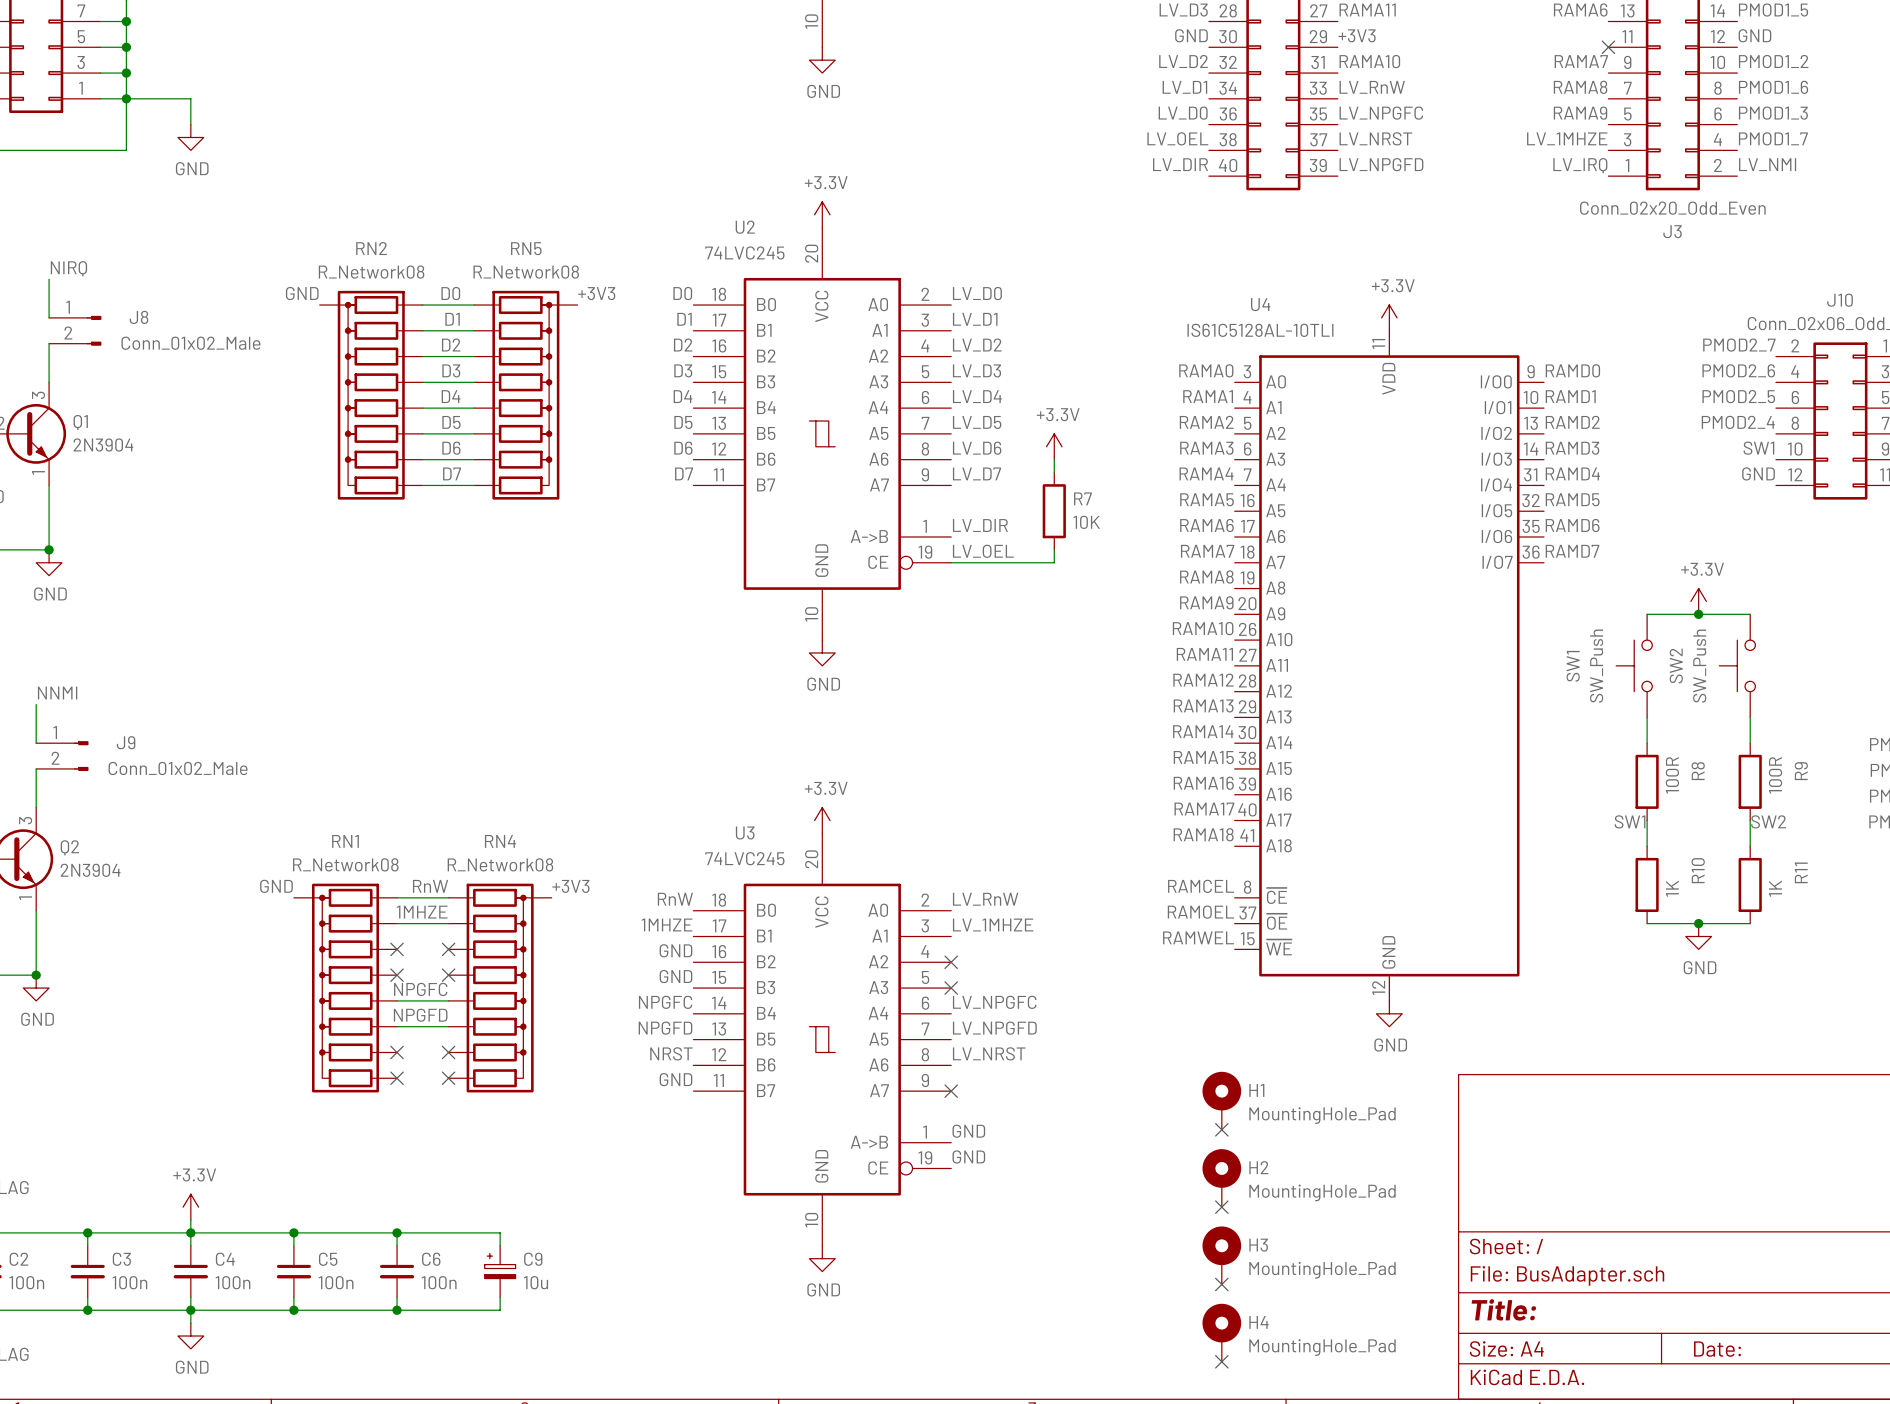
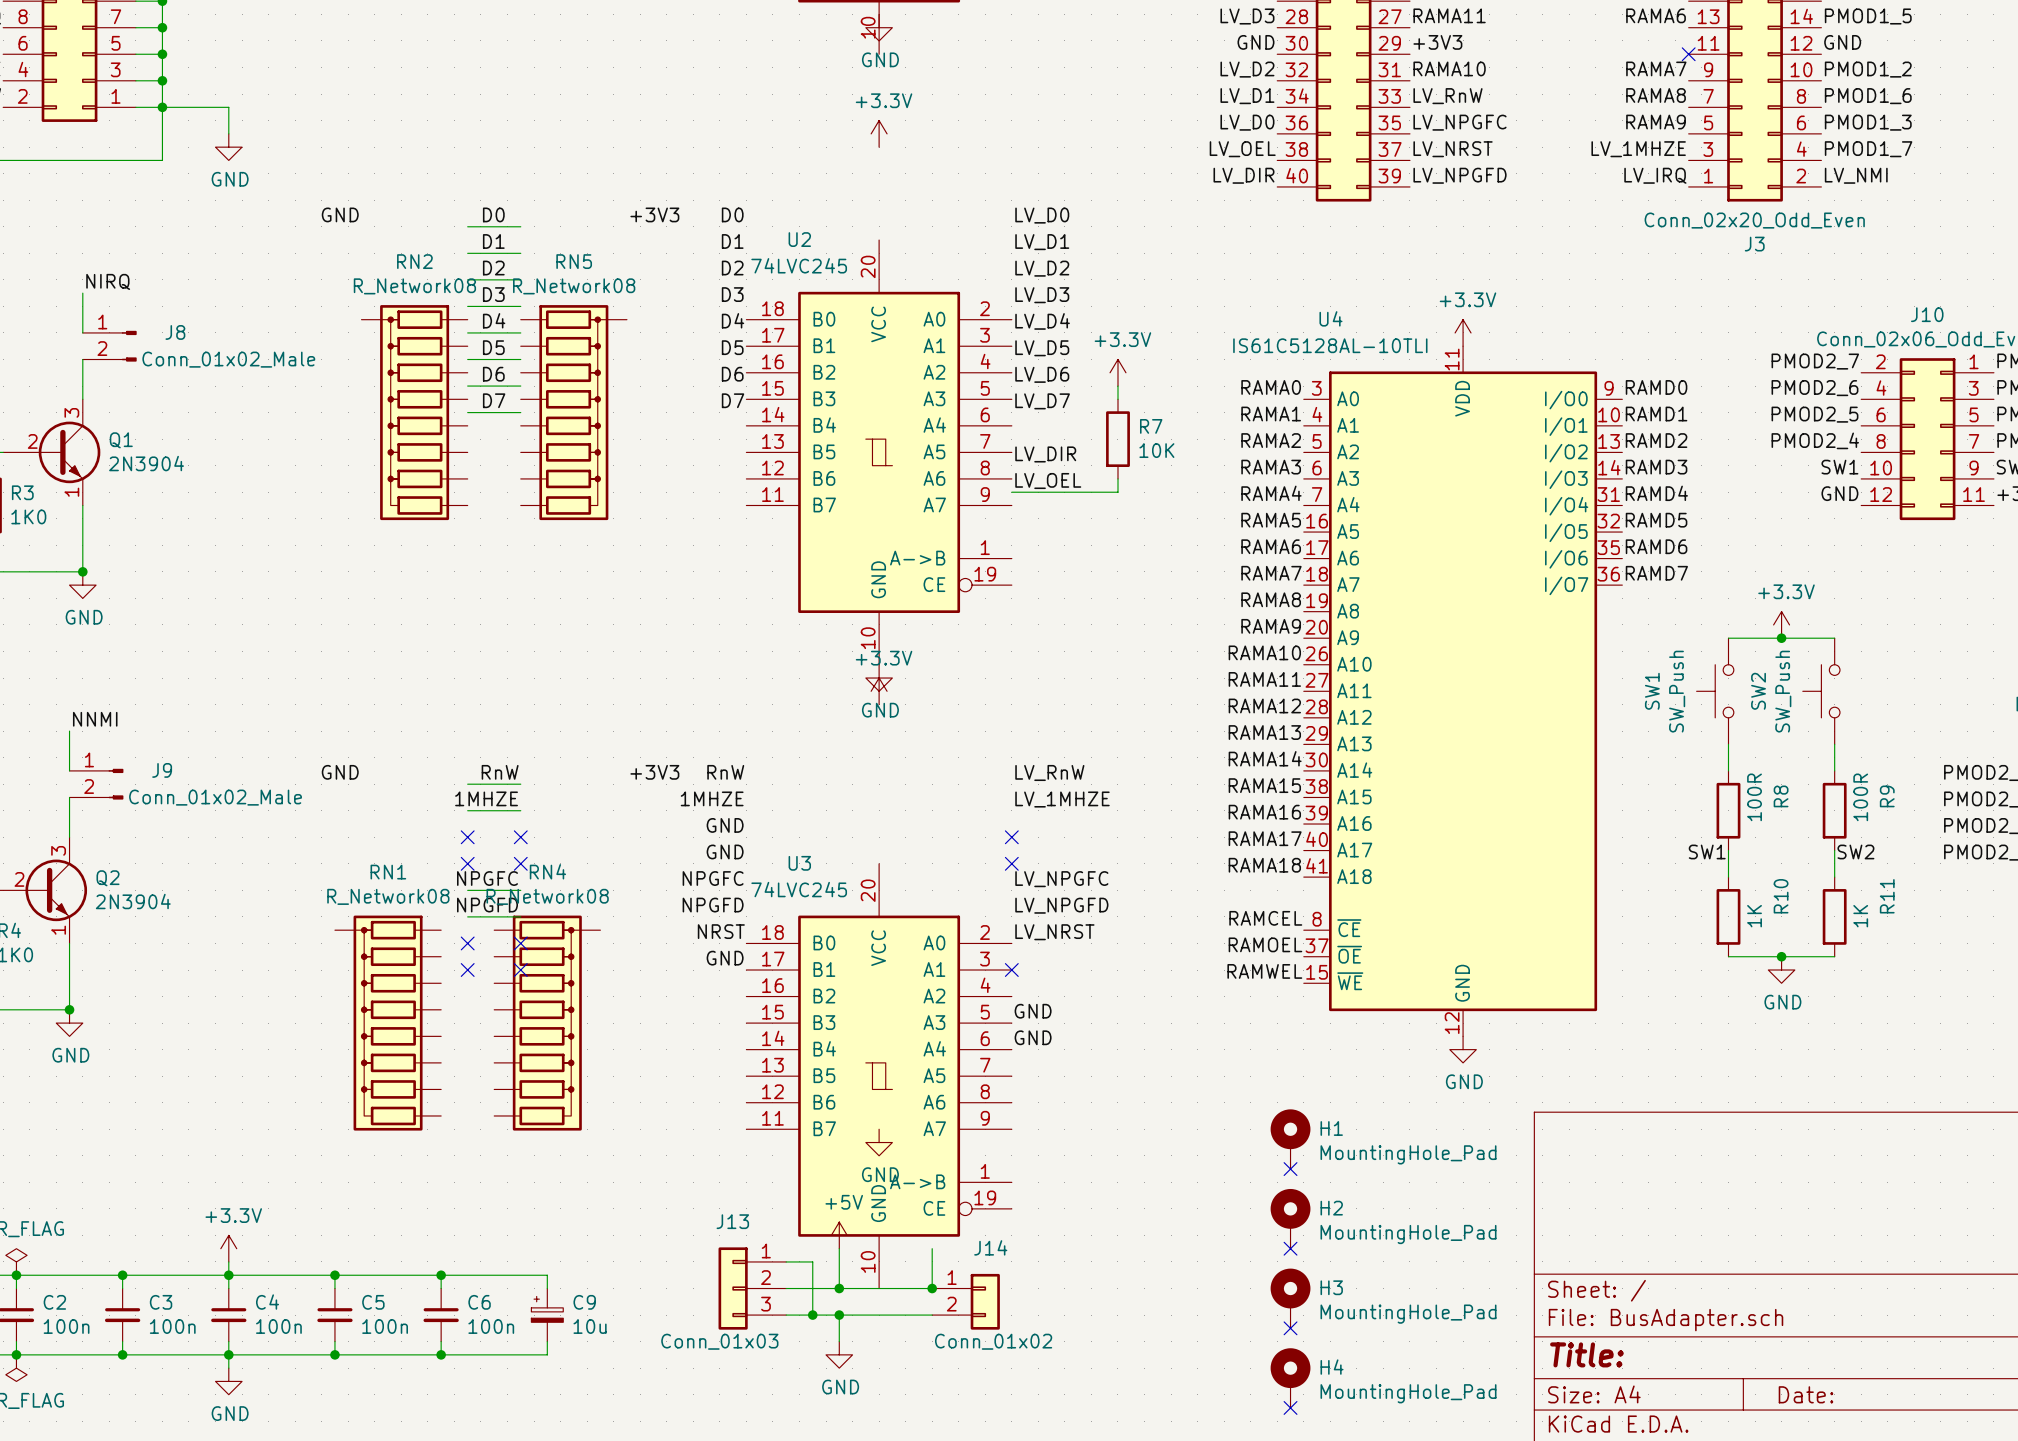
power symbol position: GND (822, 60) -> GND (879, 27)
wire: none -> (467, 226) (520, 226)
power symbol position: +3.3V (822, 214) -> +3.3V (879, 133)
label position: GND (302, 293) -> GND (340, 214)
label position: D0 (450, 293) -> D0 (493, 214)
label position: +3V3 (596, 293) -> +3V3 (654, 214)
label position: D0 (682, 293) -> D0 (732, 214)
label position: LV_D0 (977, 293) -> LV_D0 (1042, 215)
wire: (422, 305) (474, 305) -> (467, 279) (520, 279)
label position: D1 (452, 319) -> D1 (493, 241)
label position: D1 (684, 319) -> D1 (732, 241)
label position: LV_D1 (975, 319) -> LV_D1 (1042, 242)
wire: (422, 330) (474, 330) -> (467, 306) (520, 306)
label position: D2 (451, 344) -> D2 (493, 268)
label position: D2 (683, 344) -> D2 (732, 268)
label position: LV_D2 (977, 344) -> LV_D2 (1042, 268)
wire: (422, 356) (474, 356) -> (467, 332) (520, 332)
wire: none -> (1117, 386) (1117, 399)
label position: D3 (451, 370) -> D3 (493, 294)
label position: D3 (683, 370) -> D3 (732, 294)
label position: LV_D3 (976, 370) -> LV_D3 (1042, 295)
wire: (422, 382) (474, 382) -> (467, 359) (520, 359)
label position: D4 (451, 396) -> D4 (494, 320)
label position: D4 (682, 396) -> D4 (733, 320)
label position: LV_D4 (977, 396) -> LV_D4 (1042, 321)
wire: (422, 408) (474, 408) -> (467, 386) (520, 386)
label position: D5 (451, 422) -> D5 (493, 347)
label position: D5 (683, 422) -> D5 (732, 347)
label position: LV_D5 (977, 422) -> LV_D5 (1042, 348)
wire: (422, 433) (474, 433) -> (467, 412) (520, 412)
power symbol position: +3.3V (1054, 446) -> +3.3V (1117, 372)
label position: D6 (451, 448) -> D6 (493, 374)
label position: D6 (683, 448) -> D6 (732, 374)
label position: LV_D6 (977, 448) -> LV_D6 (1042, 374)
wire: (422, 459) (474, 459) -> (467, 253) (520, 253)
wire: none -> (1011, 492) (1117, 492)
label position: D7 (452, 473) -> D7 (494, 400)
label position: D7 (684, 473) -> D7 (733, 400)
label position: LV_D7 (977, 473) -> LV_D7 (1042, 401)
wire: (422, 485) (474, 485) -> none
R7 position: (1054, 511) -> (1117, 439)
label position: LV_DIR (980, 525) -> LV_DIR (1045, 454)
wire: (1054, 549) (1054, 562) (951, 562) -> none
label position: LV_OEL (983, 551) -> LV_OEL (1048, 481)
label: none -> RnW (500, 772)
label: none -> RnW (725, 772)
label: none -> LV_RnW (1049, 772)
label: none -> 1MHZE (486, 798)
label: none -> 1MHZE (712, 798)
label: none -> GND (725, 825)
no-connect mark: none -> (467, 837)
no-connect mark: none -> (520, 837)
no-connect mark: none -> (1011, 837)
power symbol position: +3.3V (822, 820) -> +3.3V (879, 691)
label: none -> GND (725, 851)
no-connect mark: none -> (467, 863)
no-connect mark: none -> (520, 863)
no-connect mark: none -> (1011, 863)
label: none -> NPGFC (487, 878)
label: none -> NPGFC (713, 878)
label: none -> LV_NPGFC (1061, 879)
label: none -> NPGFD (487, 905)
label: none -> NPGFD (713, 905)
label position: GND (276, 886) -> GND (340, 772)
label: RnW (430, 886) -> none
label position: +3V3 (570, 886) -> +3V3 (654, 772)
wire: (397, 897) (448, 897) -> (467, 784) (520, 784)
label: RnW (675, 899) -> NRST (721, 931)
label: LV_RnW (985, 899) -> LV_NRST (1054, 932)
no-connect mark: none -> (467, 943)
no-connect mark: none -> (520, 943)
label: 1MHZE (422, 912) -> none
wire: (397, 923) (448, 923) -> (467, 810) (520, 810)
label: 1MHZE (666, 925) -> GND (725, 958)
label position: LV_1MHZE (993, 925) -> LV_1MHZE (1062, 799)
no-connect mark: none -> (467, 970)
no-connect mark: none -> (520, 970)
no-connect mark: none -> (1011, 970)
no-connect mark: (397, 949) -> none
no-connect mark: (448, 949) -> none
label: GND (675, 950) -> none
no-connect mark: (951, 962) -> none
no-connect mark: (397, 975) -> none
no-connect mark: (448, 975) -> none
label: GND (675, 976) -> none
label: none -> GND (1033, 1011)
no-connect mark: (951, 988) -> none
label: NPGFC (420, 989) -> none
wire: (397, 1000) (448, 1000) -> (467, 890) (520, 890)
label: NPGFC (665, 1002) -> none
label: LV_NPGFC (994, 1002) -> GND (1033, 1037)
label: NPGFD (420, 1015) -> none
wire: (397, 1026) (448, 1026) -> (467, 916) (520, 916)
label: NPGFD (665, 1028) -> none
label position: LV_NPGFD (994, 1028) -> LV_NPGFD (1061, 905)
no-connect mark: (397, 1052) -> none
no-connect mark: (448, 1052) -> none
label: NRST (671, 1053) -> none
label: LV_NRST (989, 1053) -> none
no-connect mark: (397, 1078) -> none
no-connect mark: (448, 1078) -> none
label: GND (675, 1079) -> none
no-connect mark: (951, 1091) -> none
power symbol: none -> GND (879, 1142)
label: GND (968, 1131) -> none
label: GND (968, 1156) -> none
power symbol: none -> +5V (839, 1235)
wire: none -> (839, 1248) (839, 1288)
wire: none -> (932, 1248) (932, 1288) (786, 1288)
wire: none -> (786, 1261) (812, 1261) (812, 1315)
J13: none -> Conn_01x03 (752, 1288)
junction: none -> (839, 1288)
junction: none -> (932, 1288)
power symbol position: GND (822, 1258) -> GND (839, 1354)
J14: none -> Conn_01x02 (966, 1301)
wire: none -> (786, 1315) (932, 1315)
junction: none -> (812, 1315)
wire: none -> (839, 1315) (839, 1341)
junction: none -> (839, 1315)

